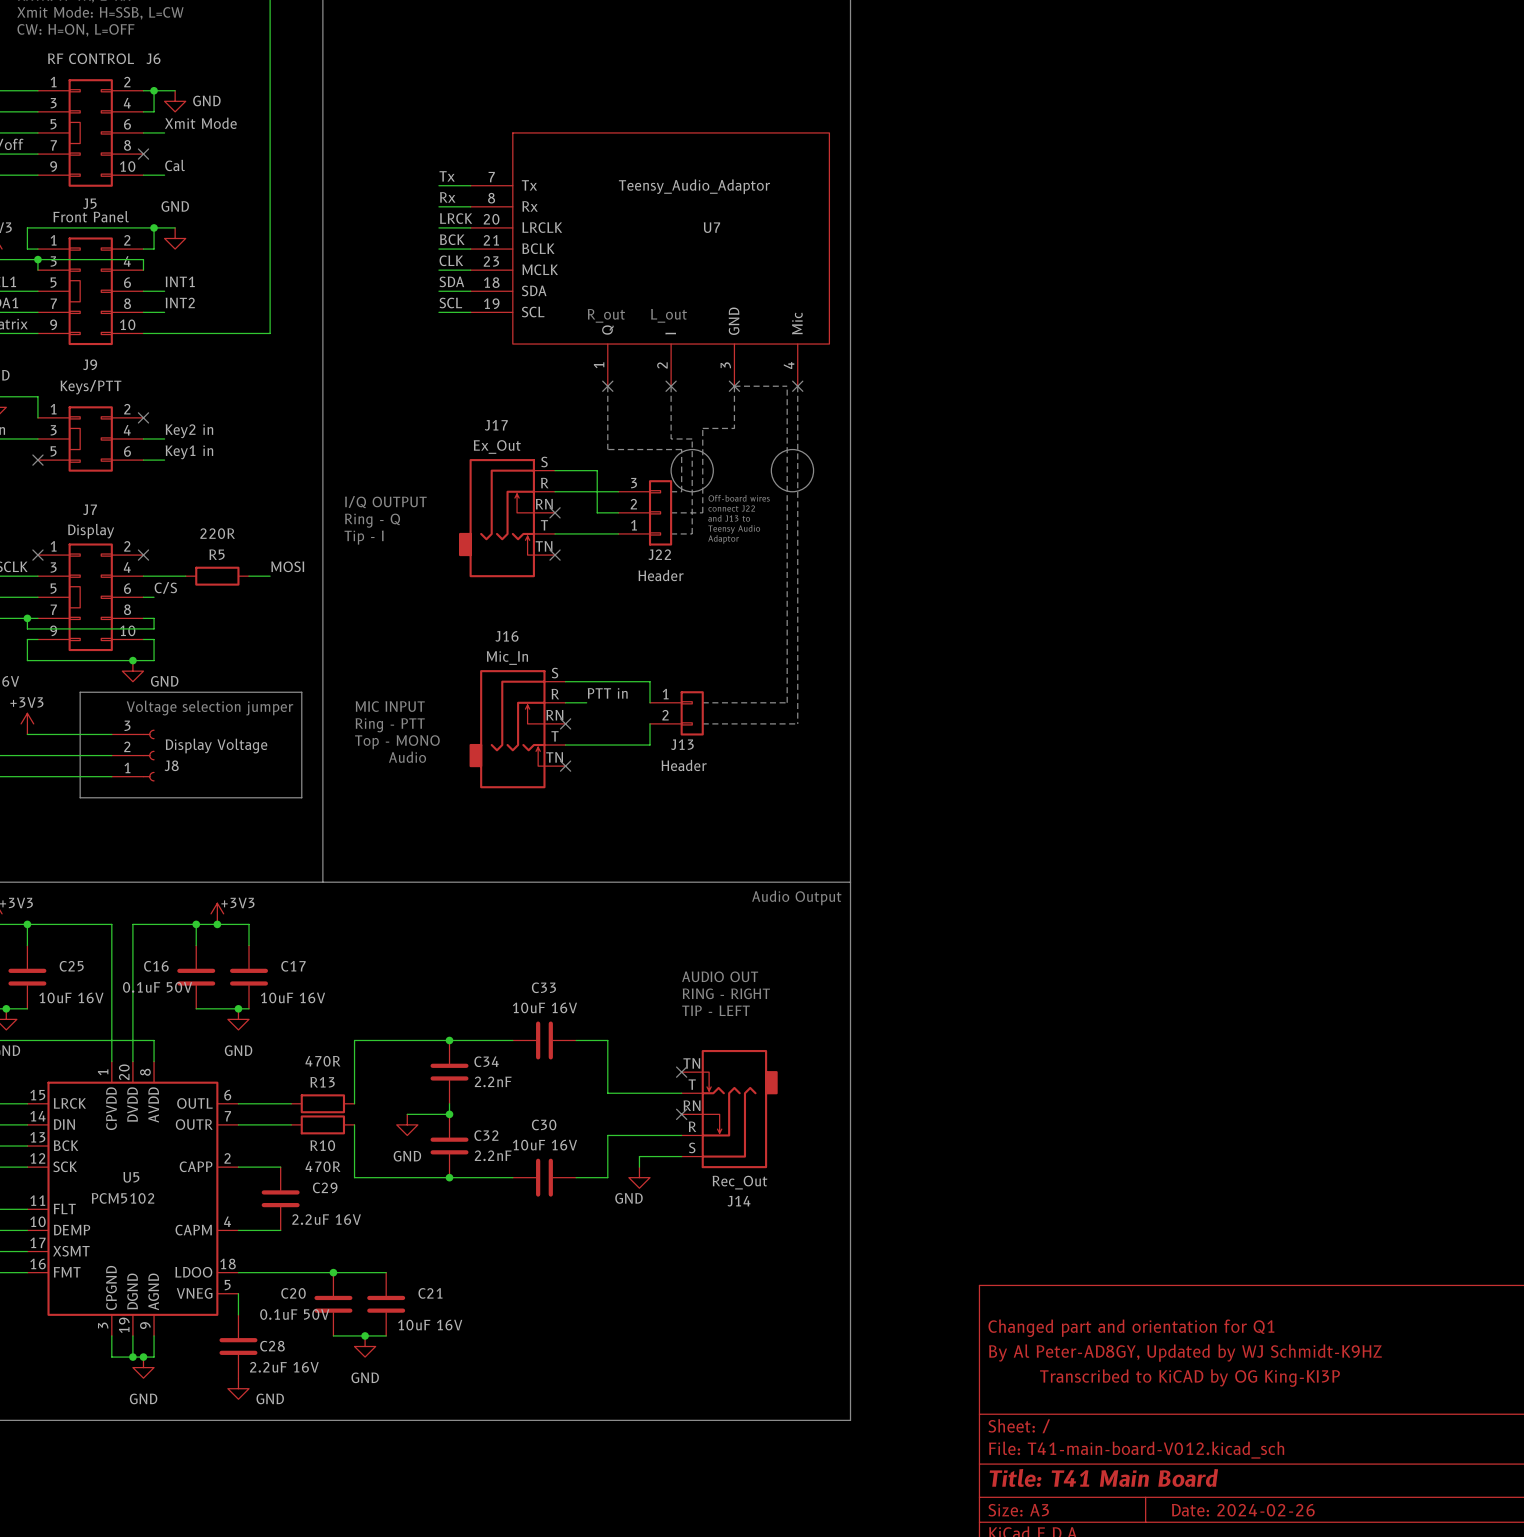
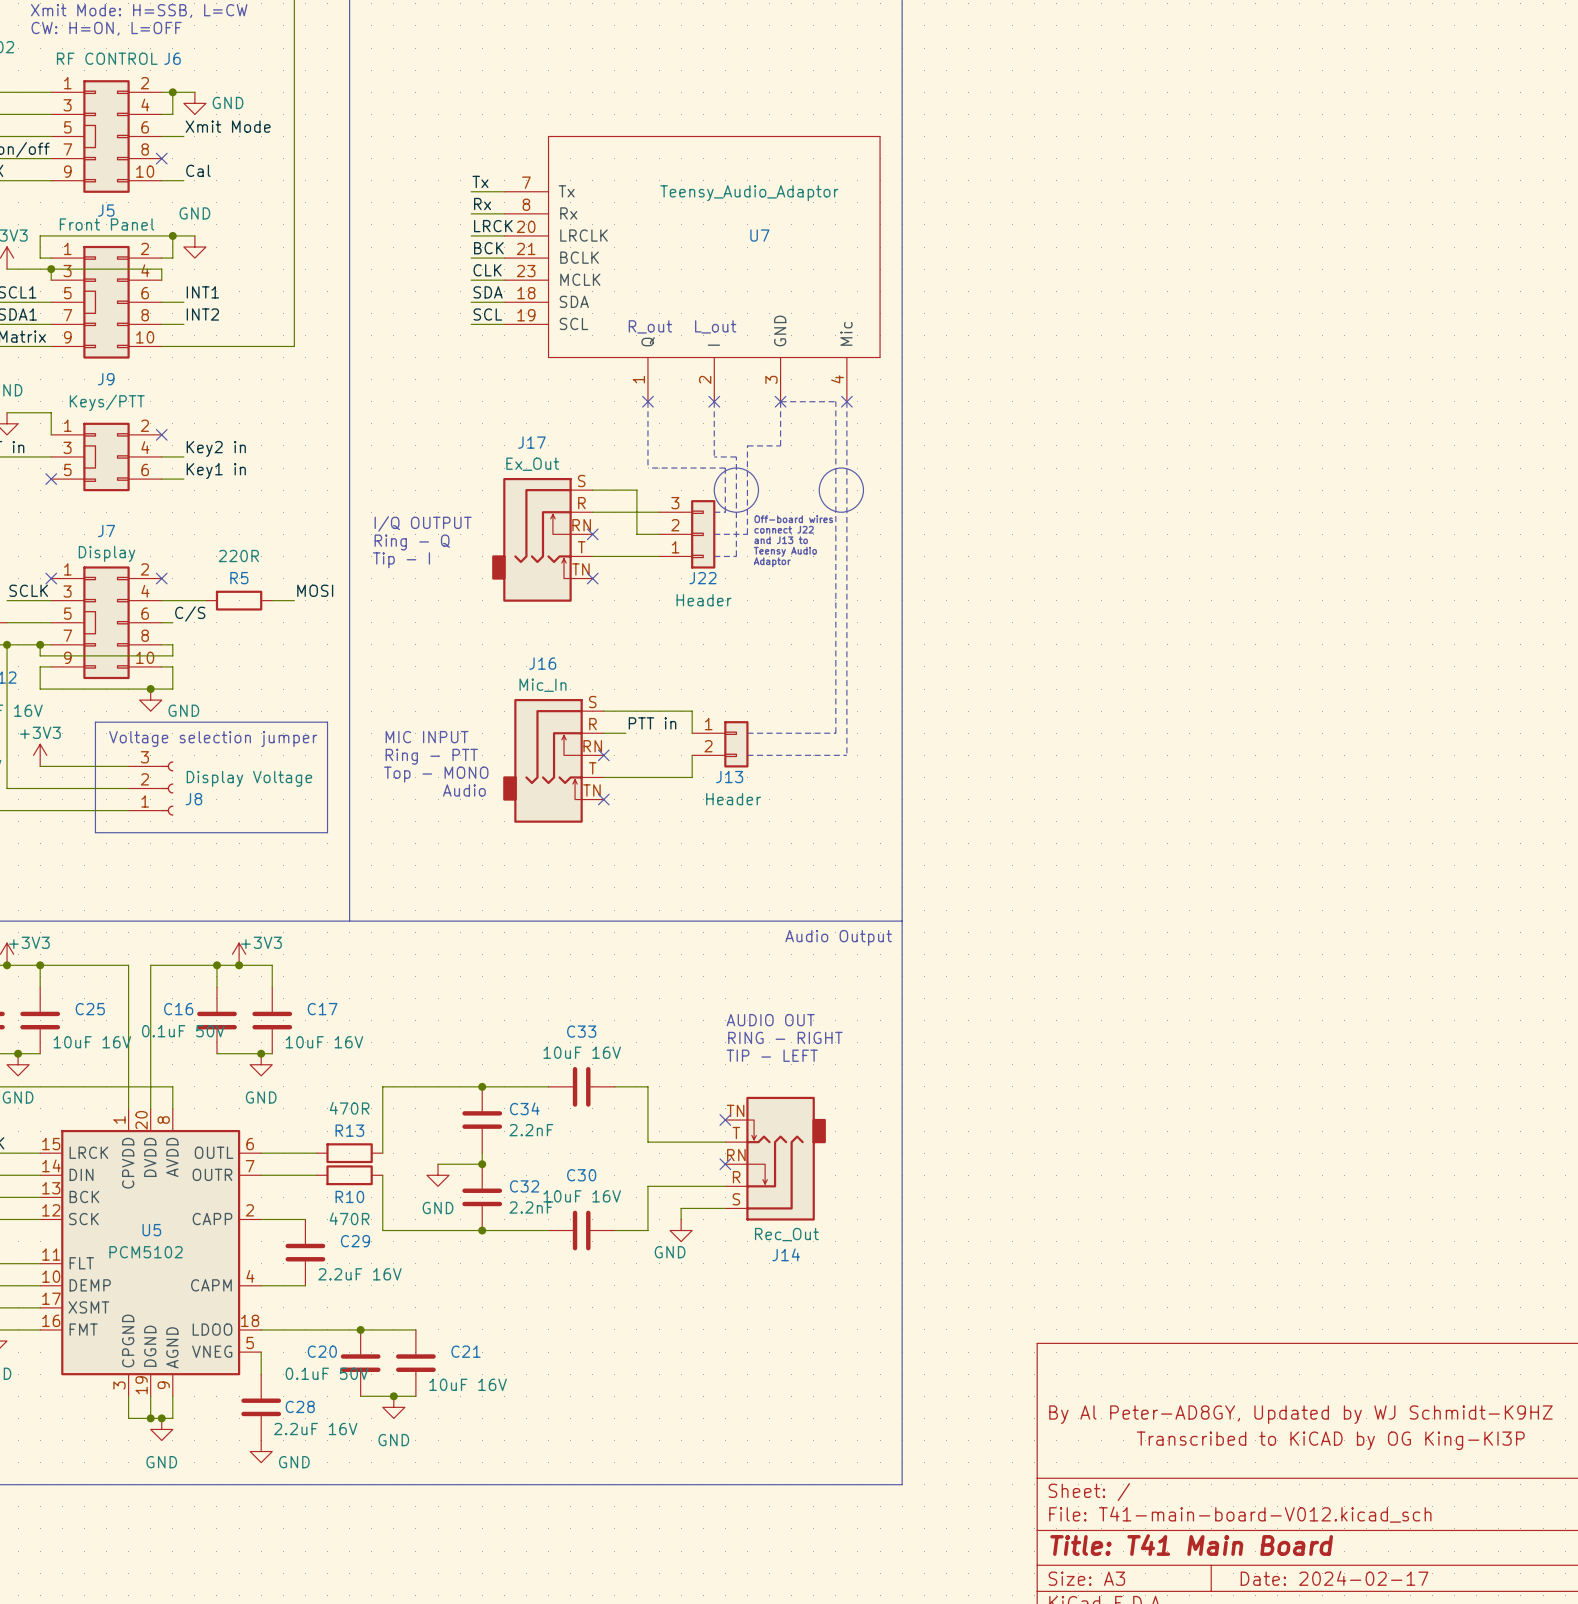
title block: Changed part and orientation for Q1 (1131, 1328) -> none
title block: Date: 2024-02-26 (1243, 1510) -> Date: 2024-02-17 (1334, 1578)

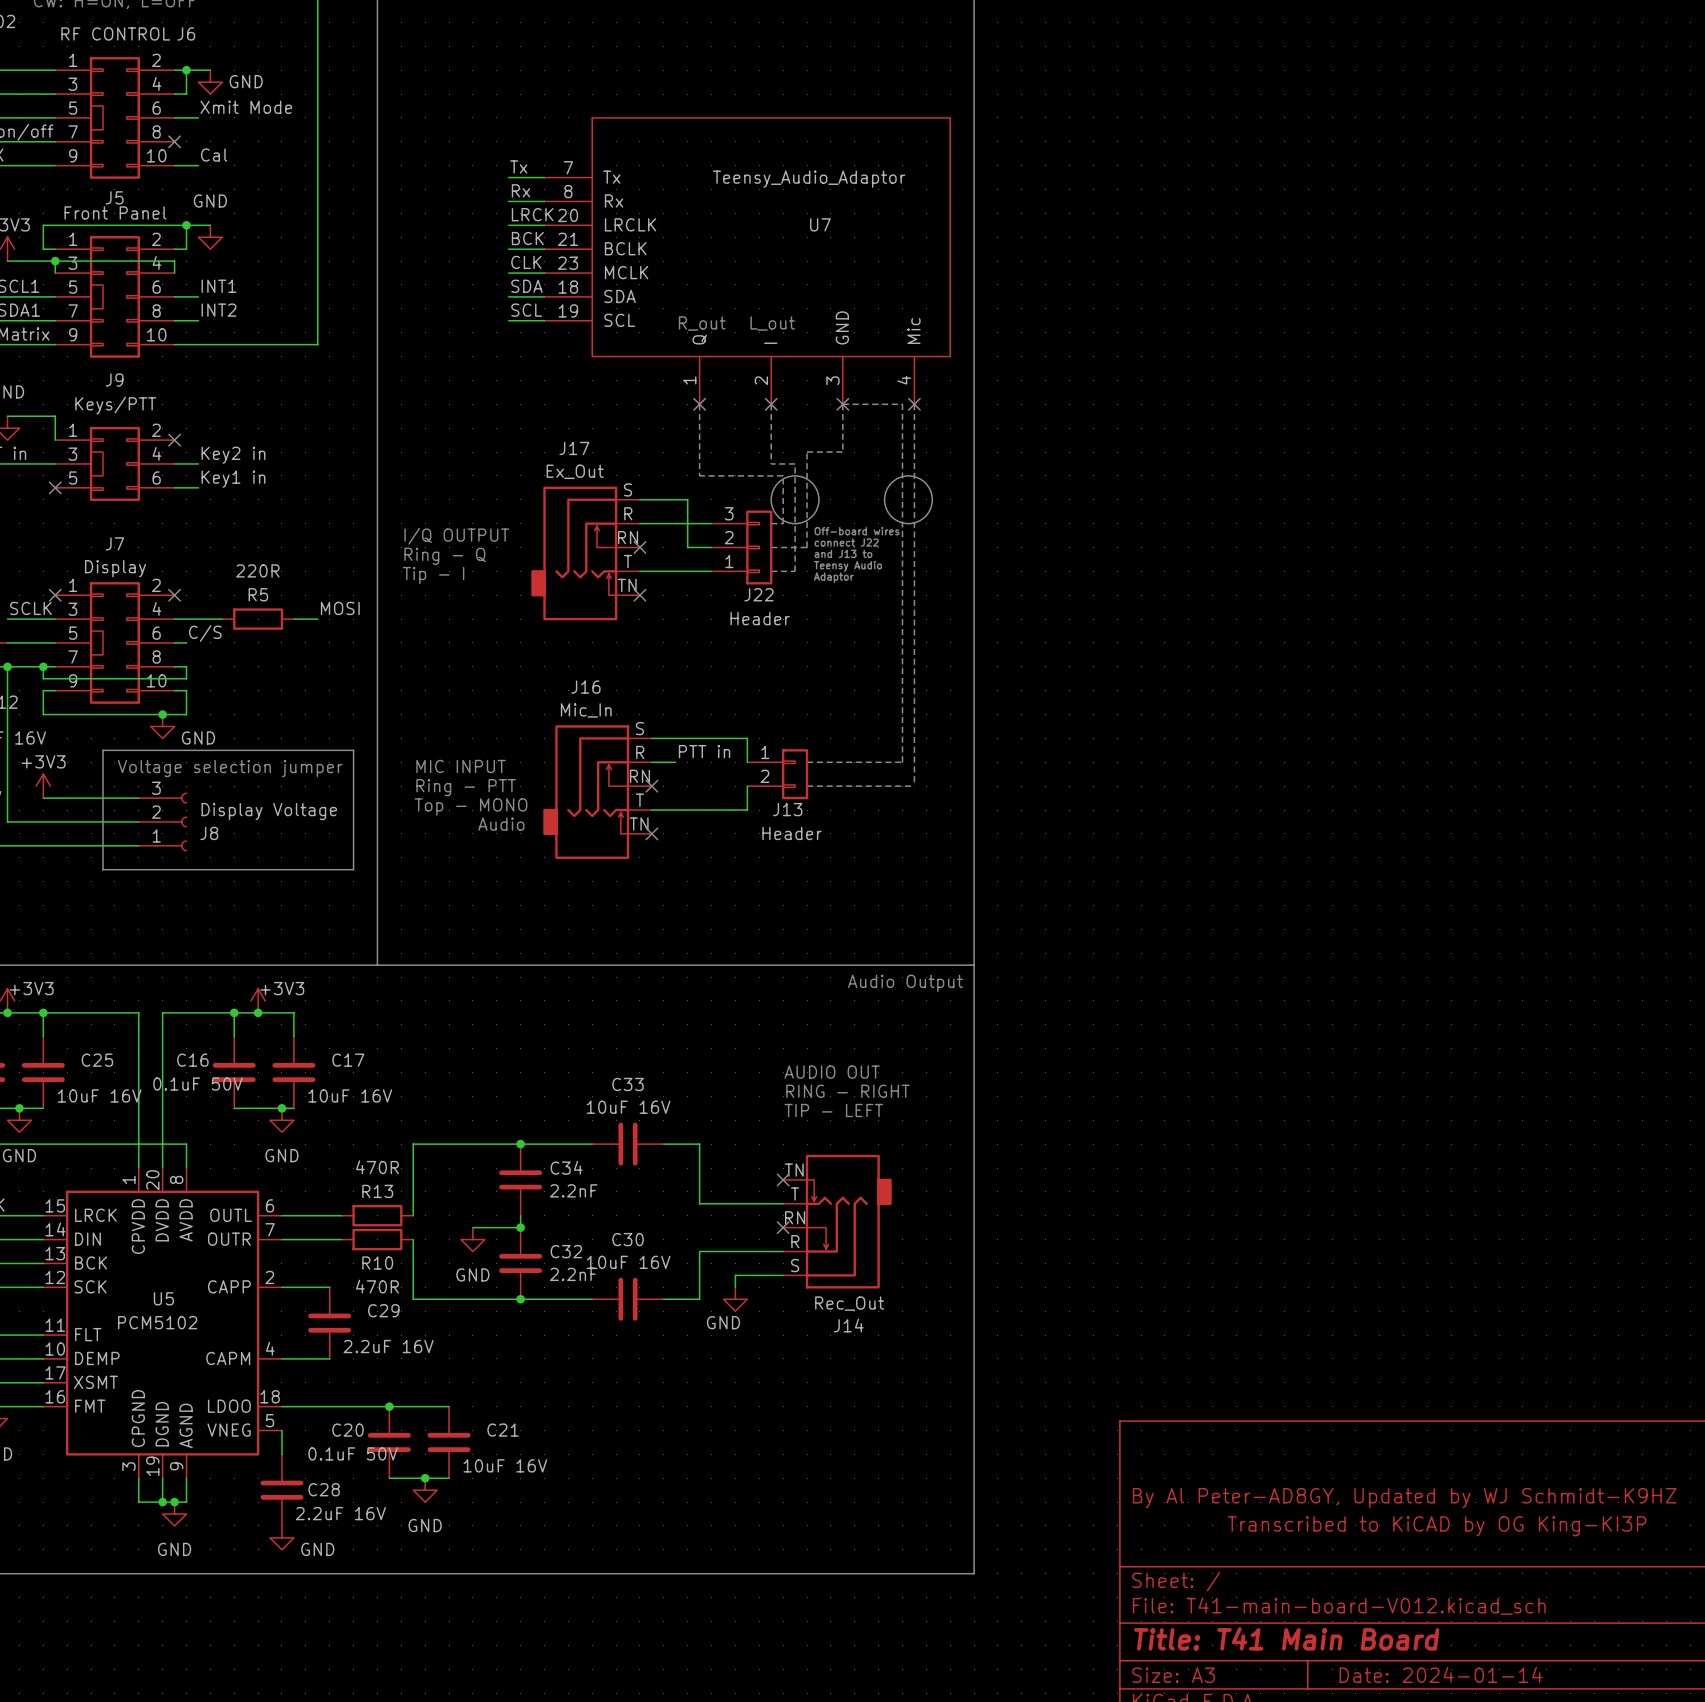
title block: Date: 2024-02-17 (1334, 1578) -> Date: 2024-01-14 (1440, 1674)

